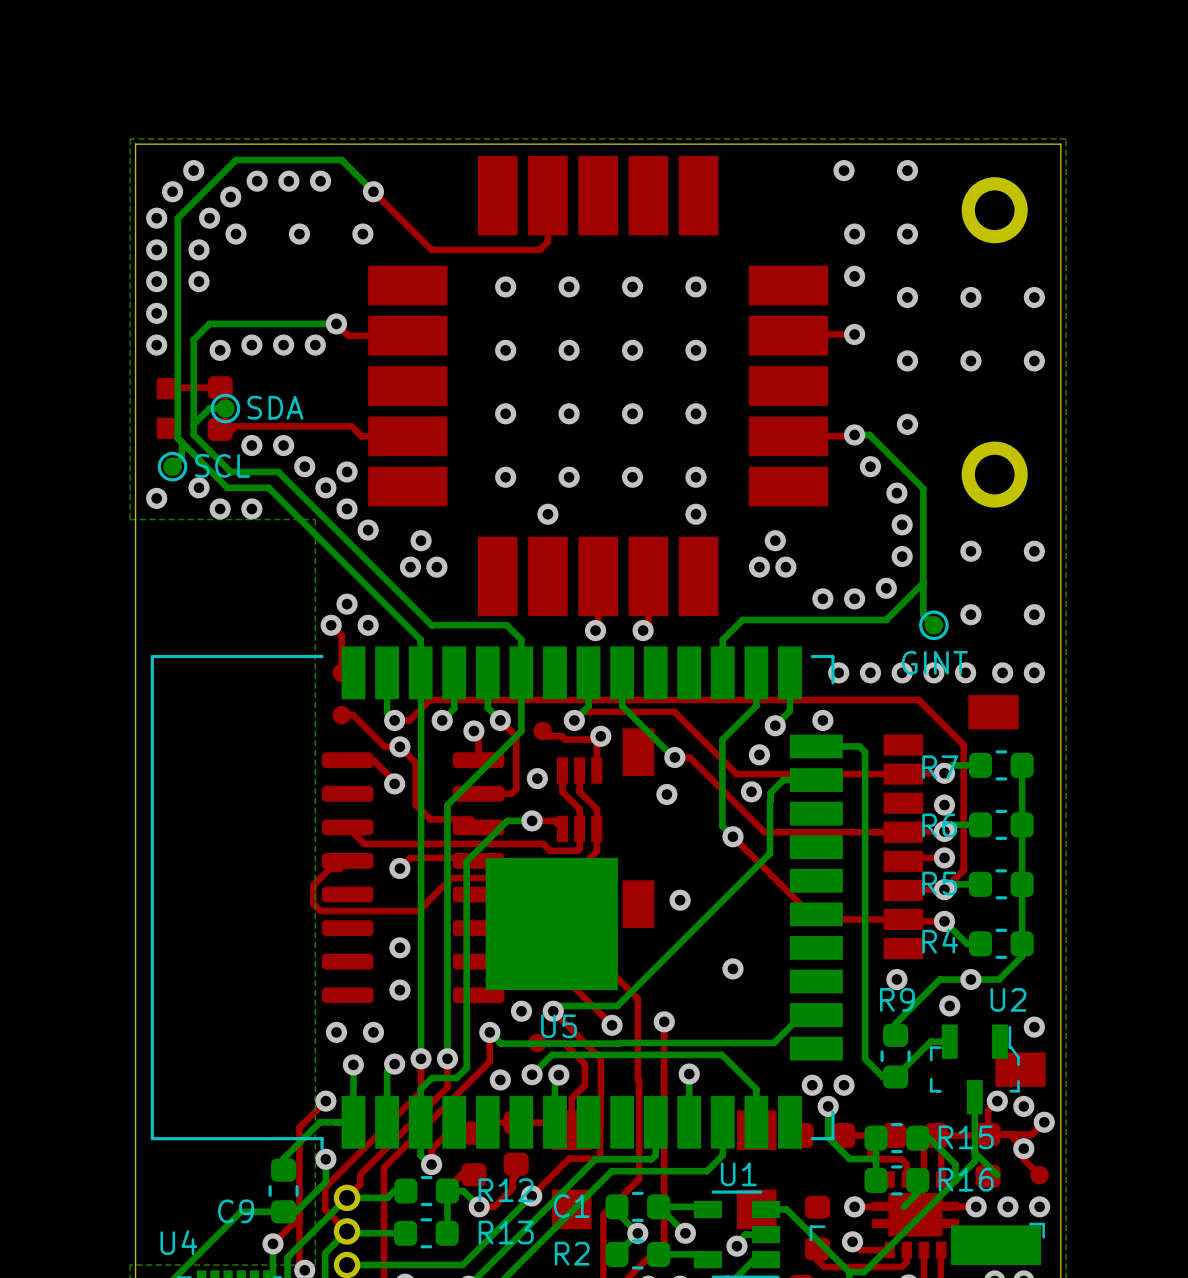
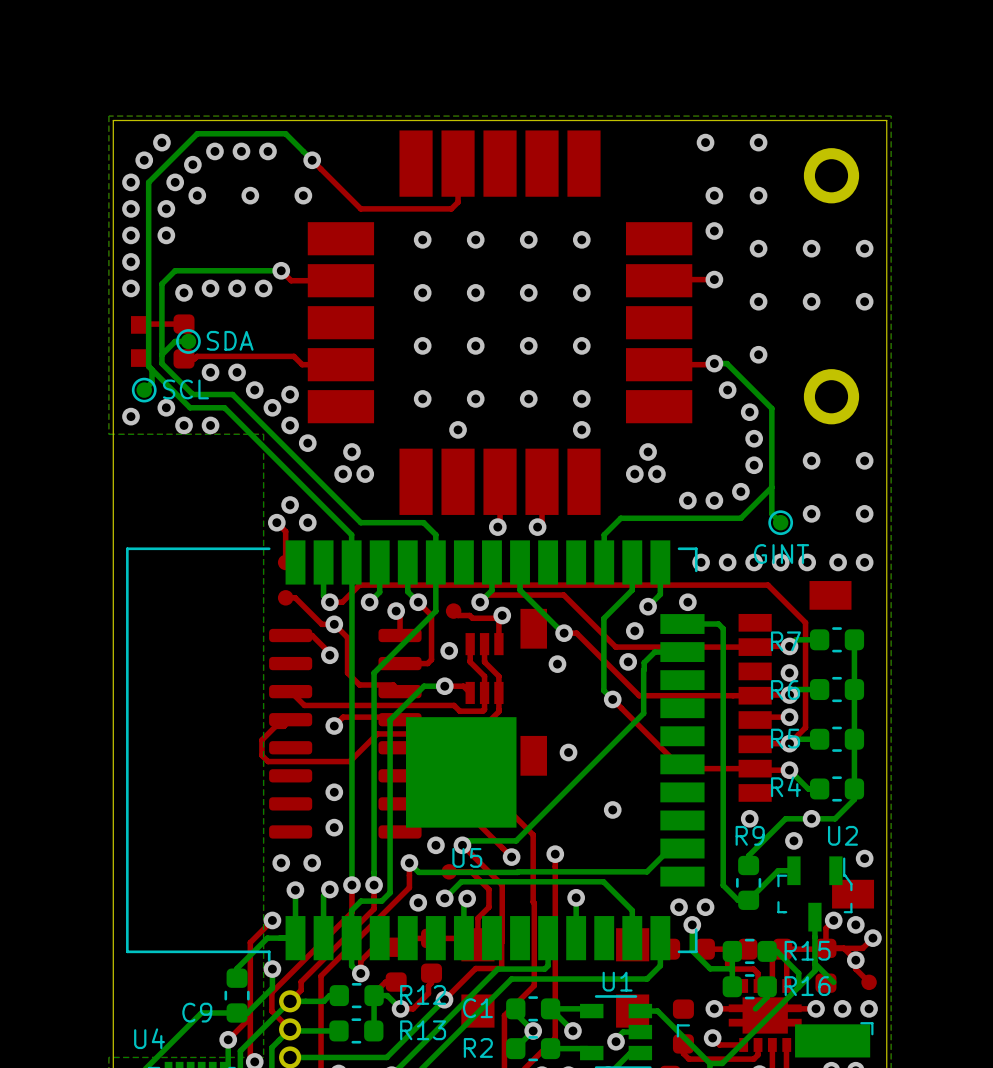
bottom track: (722, 1122) (722, 1155) (706, 1171) -> (660, 938) (660, 965) (647, 979) (590, 979)

